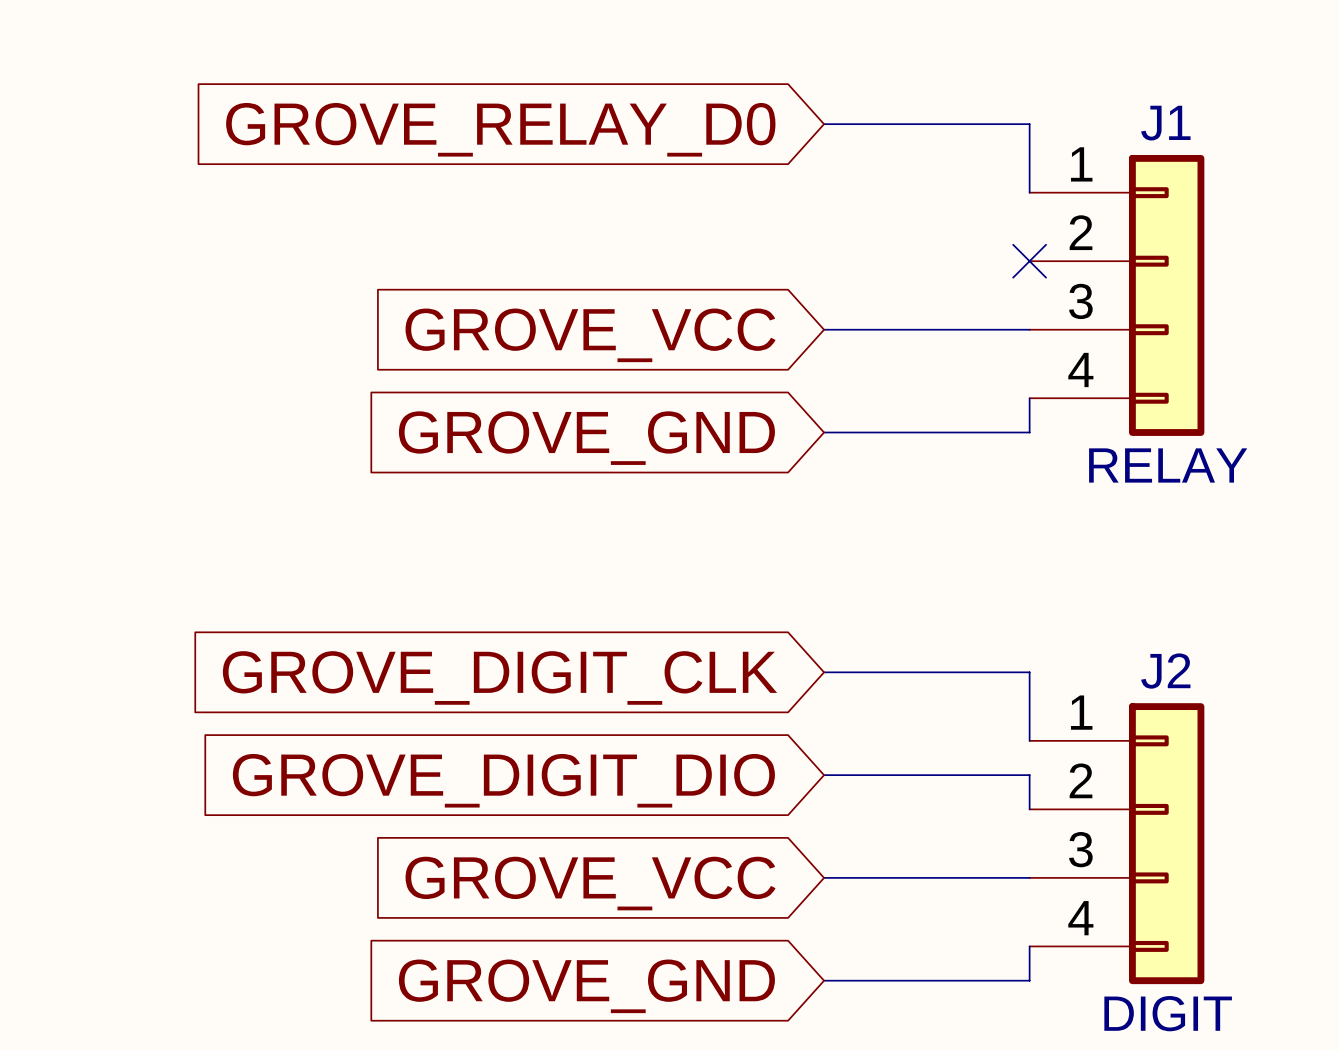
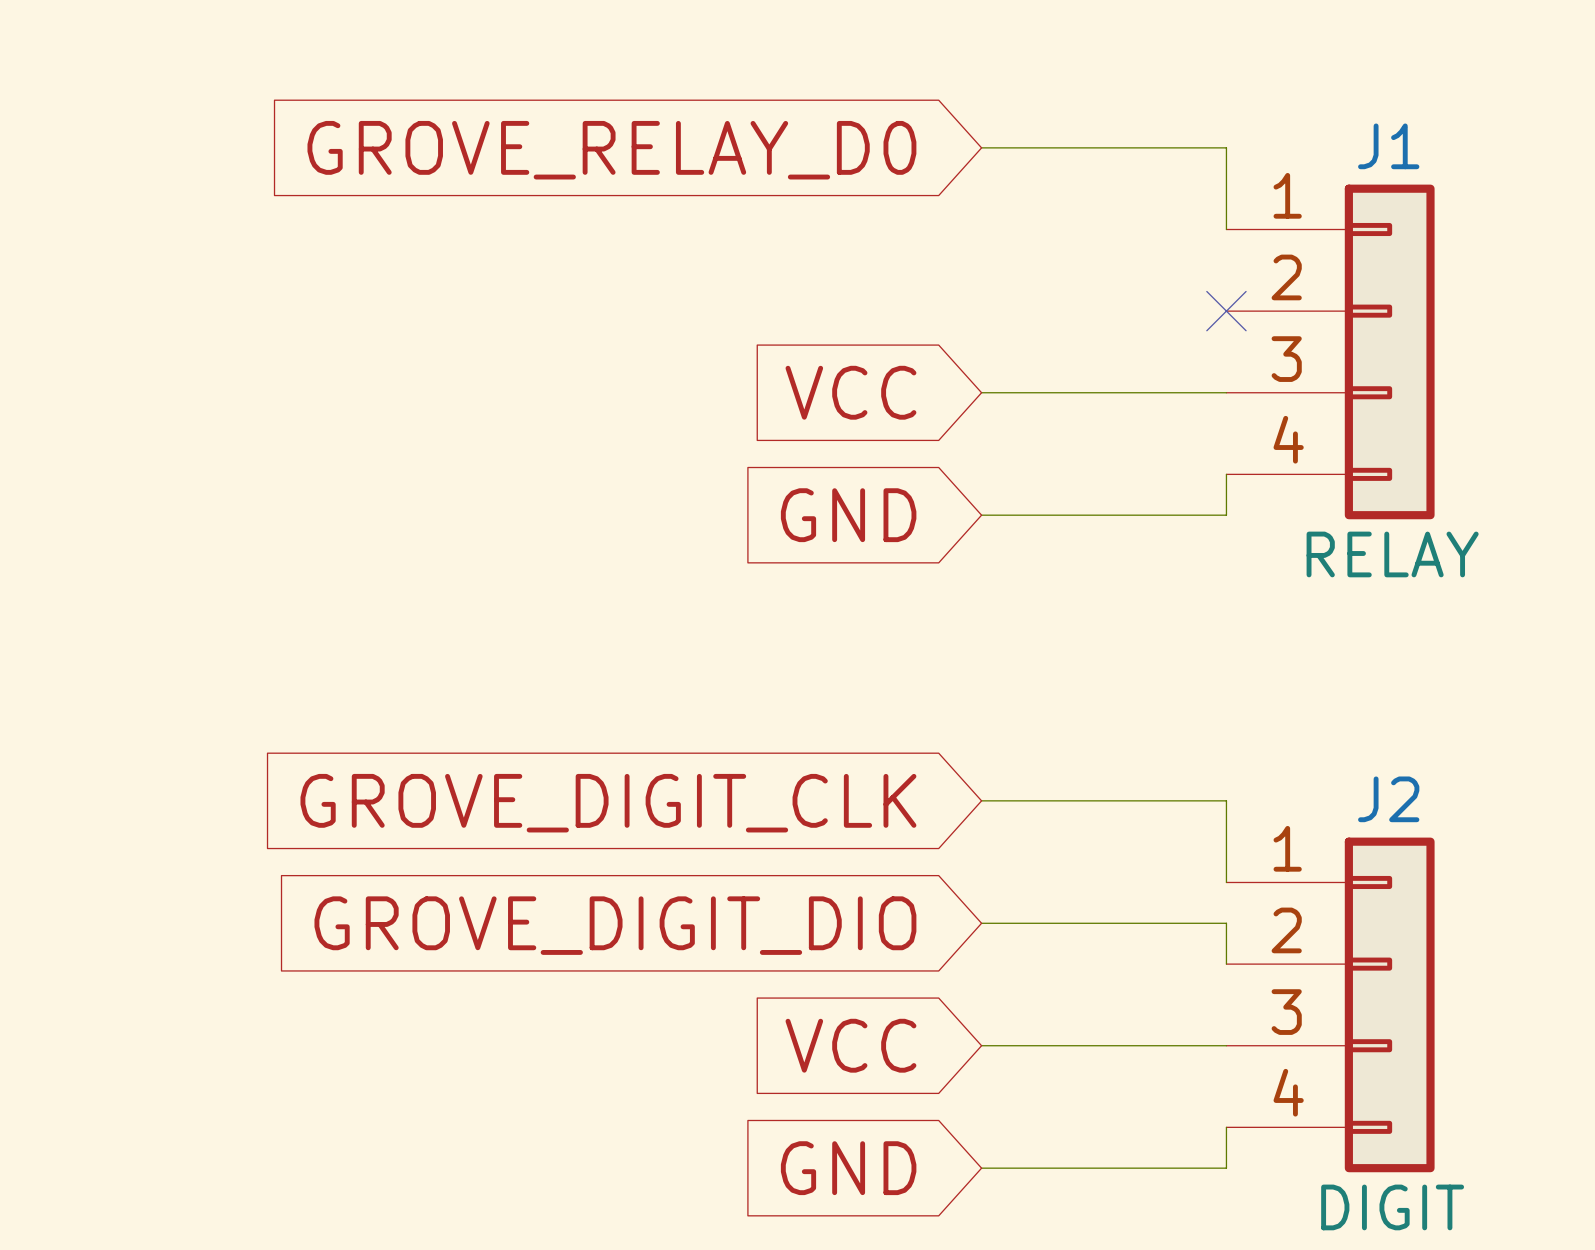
global label: GROVE_VCC (590, 335) -> VCC (850, 392)
global label: GROVE_GND (586, 438) -> GND (848, 515)
global label: GROVE_VCC (590, 883) -> VCC (850, 1045)
global label: GROVE_GND (586, 986) -> GND (848, 1168)

